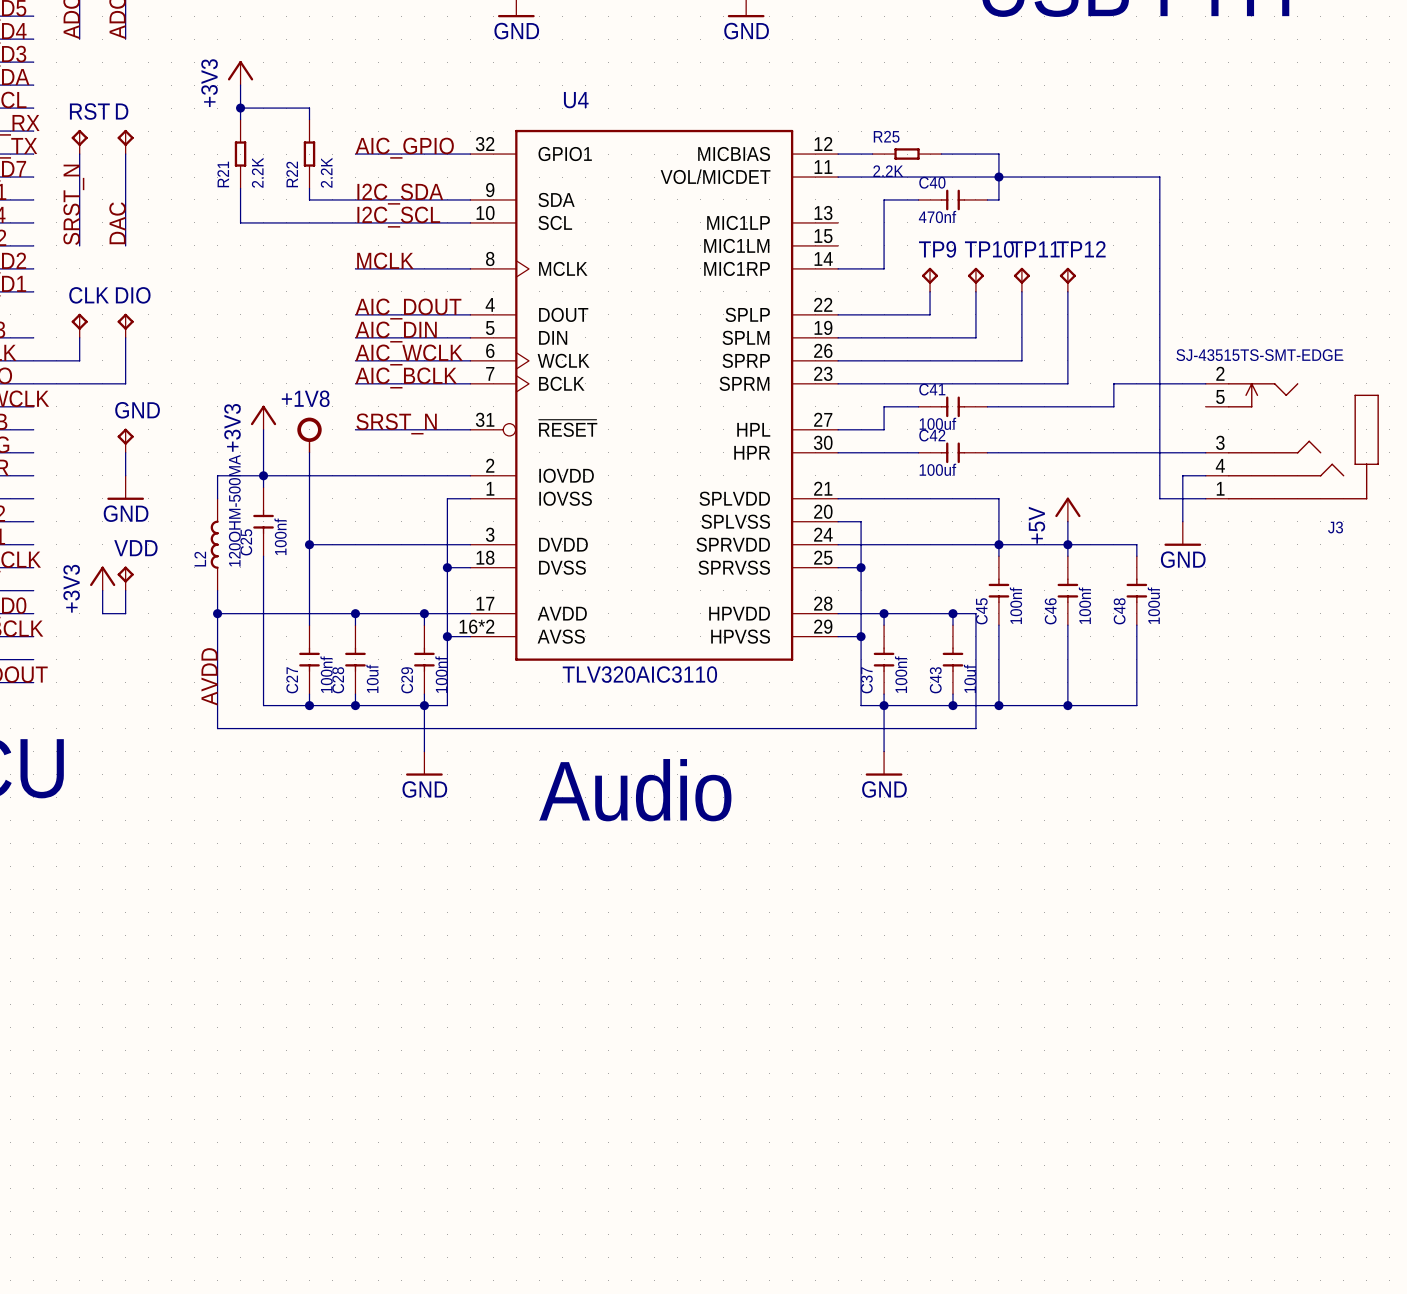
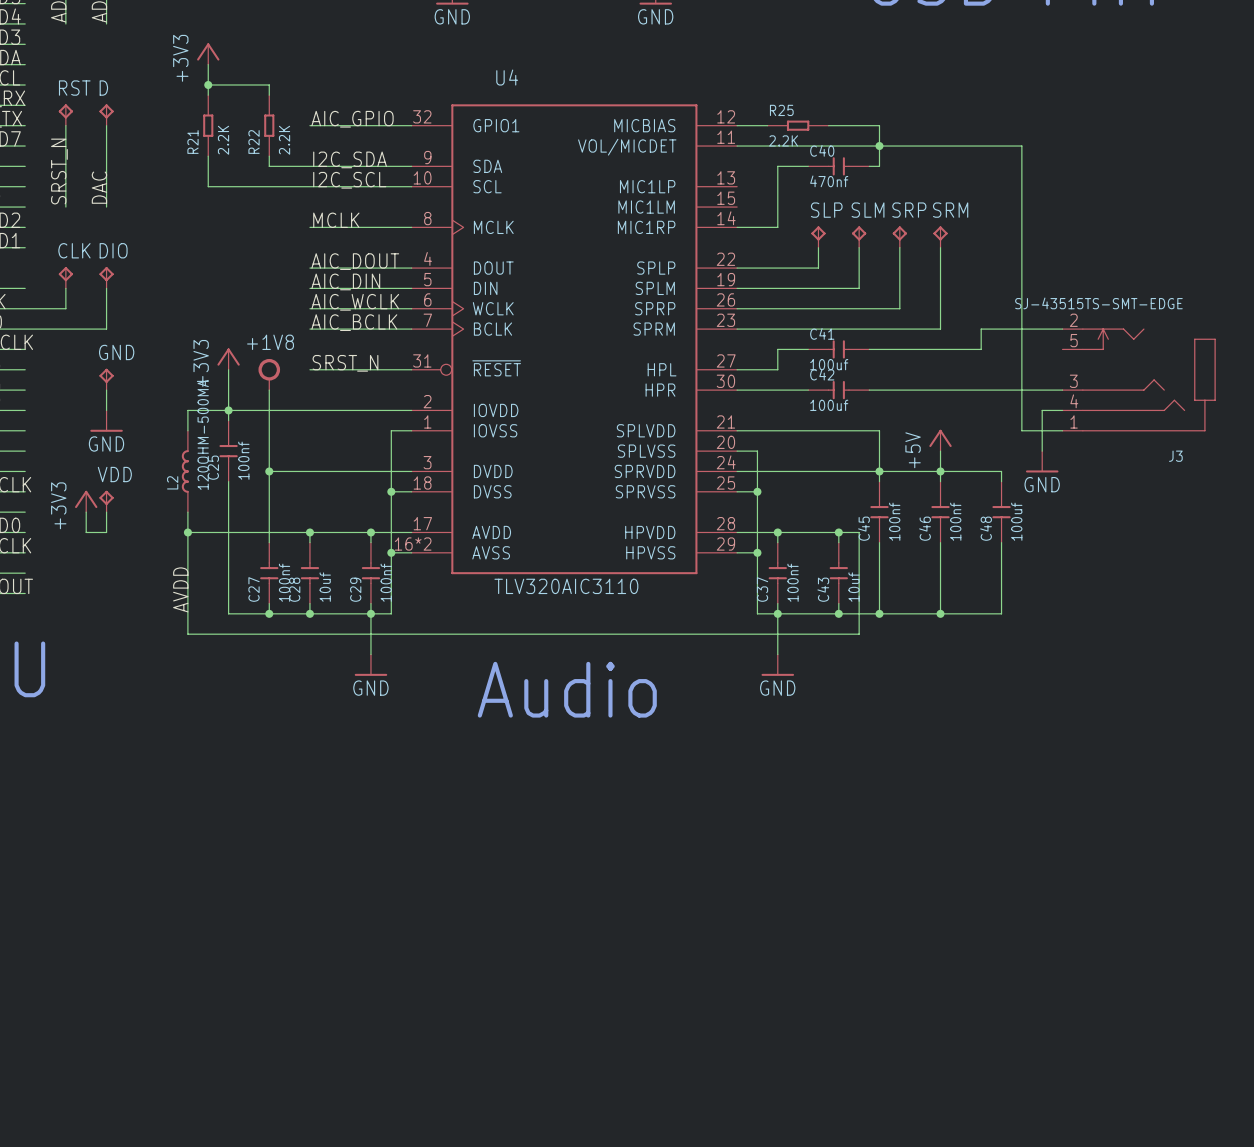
TP9 name: TP9 (937, 249) -> SLP (826, 210)
TP10 name: TP10 (989, 249) -> SLM (868, 210)
TP11 name: TP11 (1035, 249) -> SRP (909, 210)
TP12 name: TP12 (1081, 249) -> SRM (950, 210)

